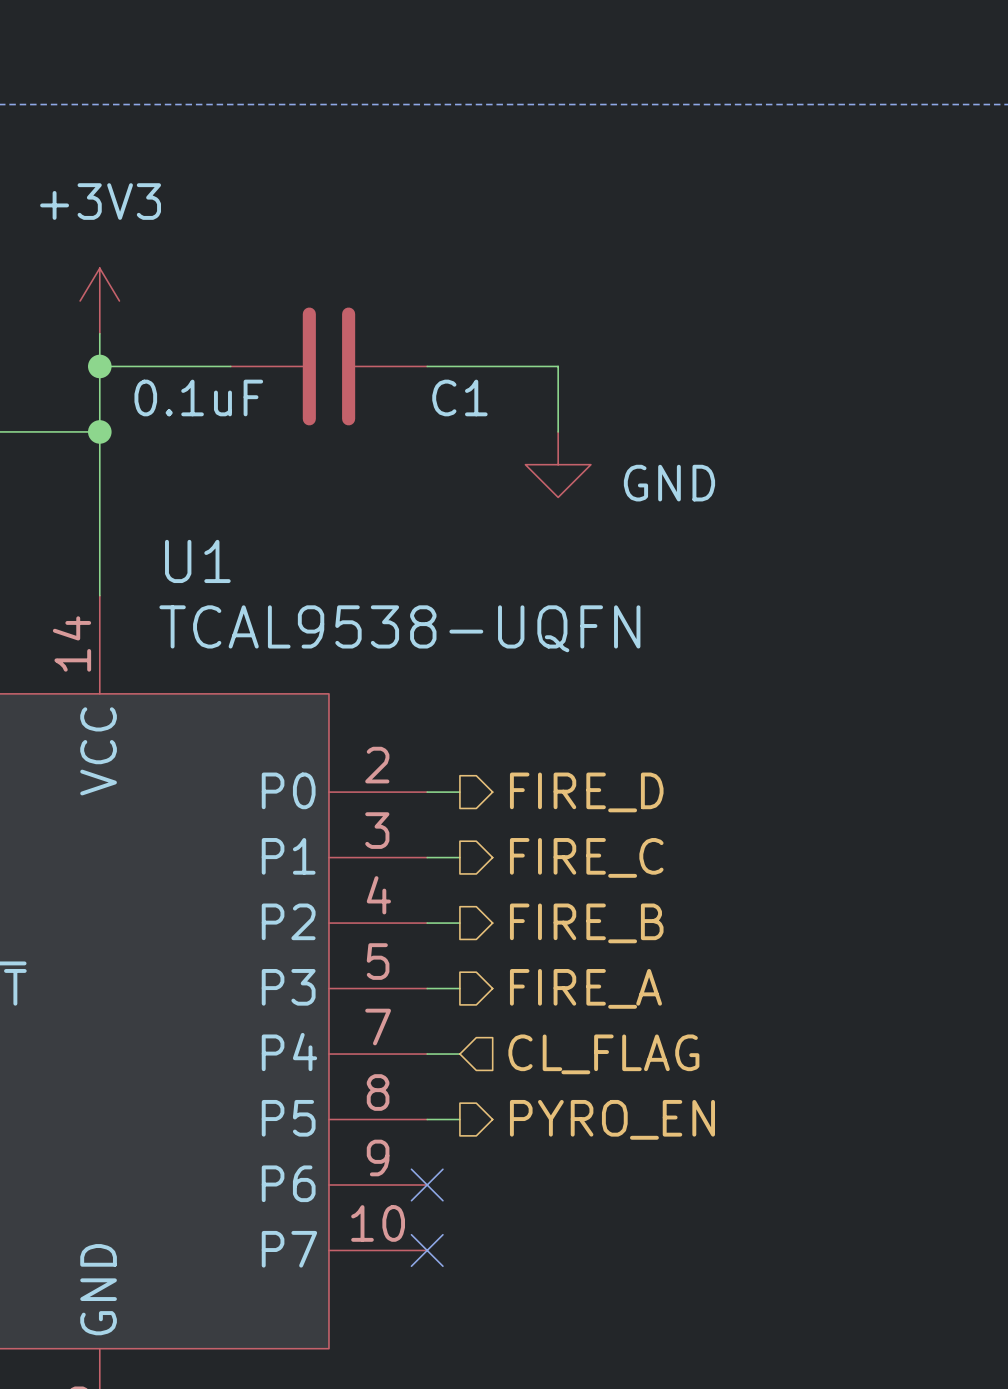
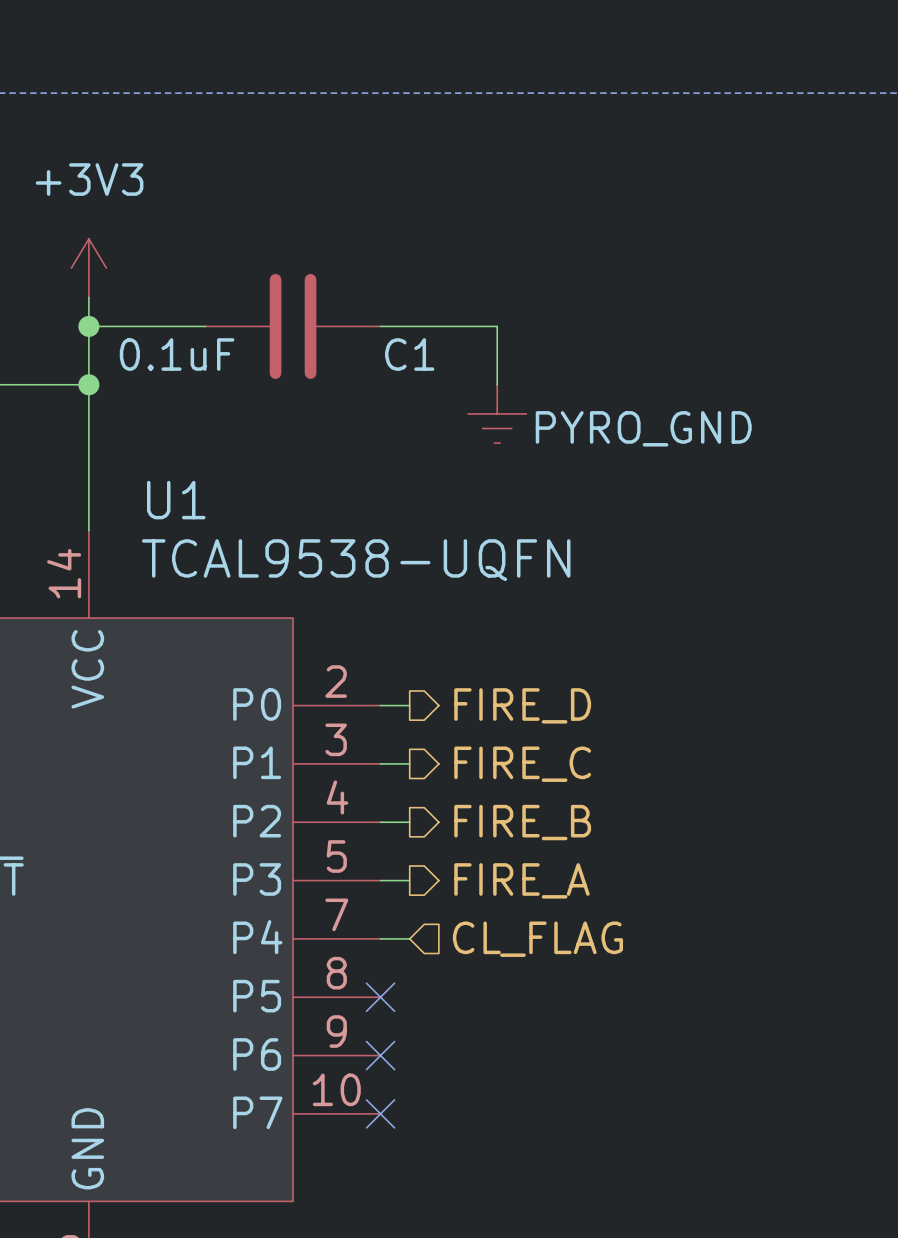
power symbol: GND (558, 464) -> PYRO_GND (497, 413)
wire: (427, 1119) (459, 1119) -> none
no-connect mark: none -> (380, 997)
hierarchical label: PYRO_EN (612, 1119) -> none

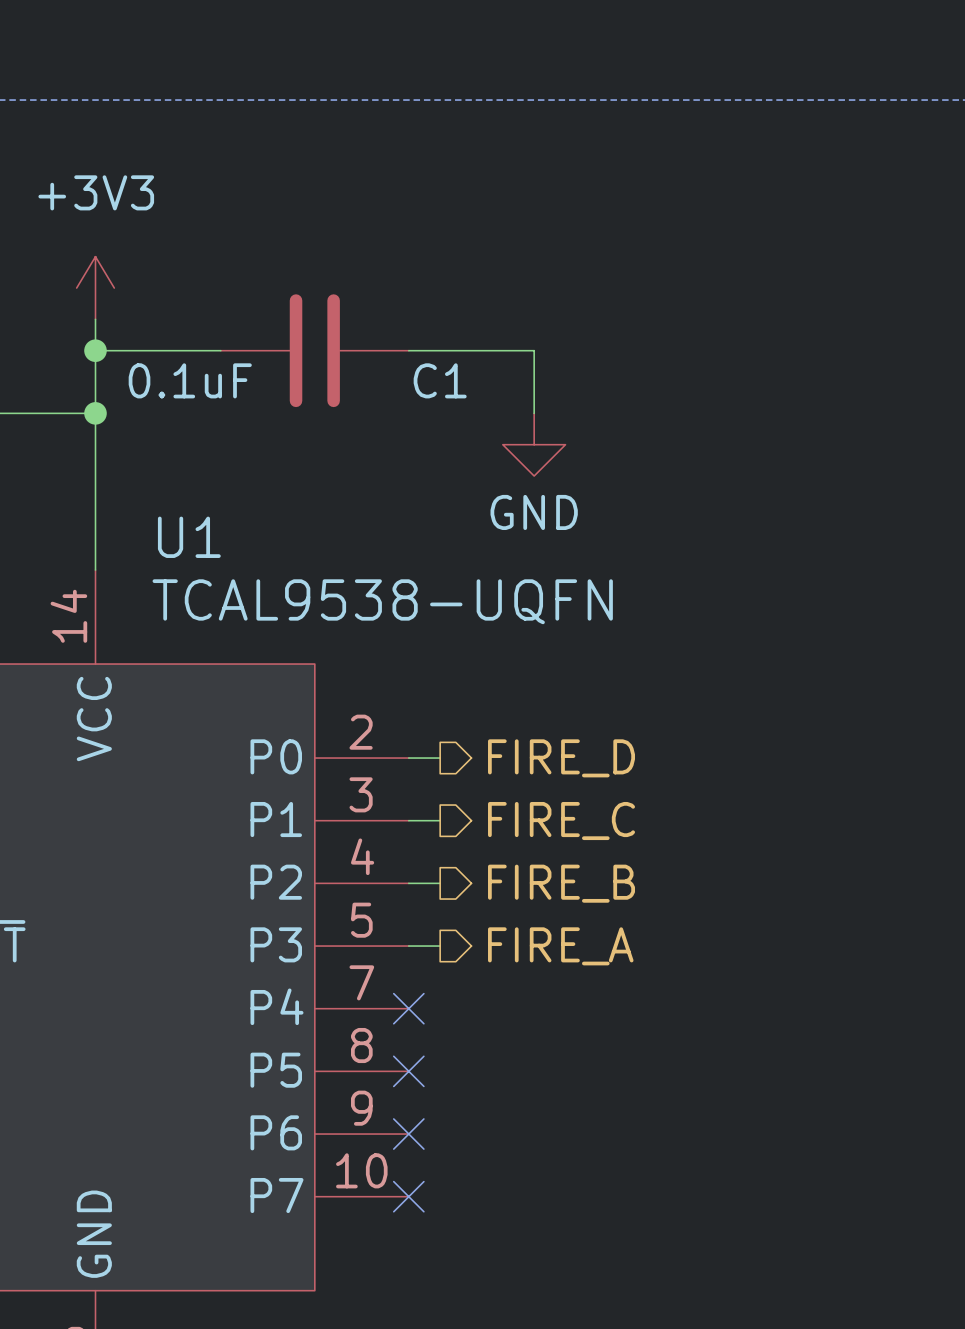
power symbol: PYRO_GND (497, 413) -> GND (534, 444)
wire: (380, 938) (409, 938) -> none
no-connect mark: none -> (408, 1008)
hierarchical label: CL_FLAG (537, 939) -> none

